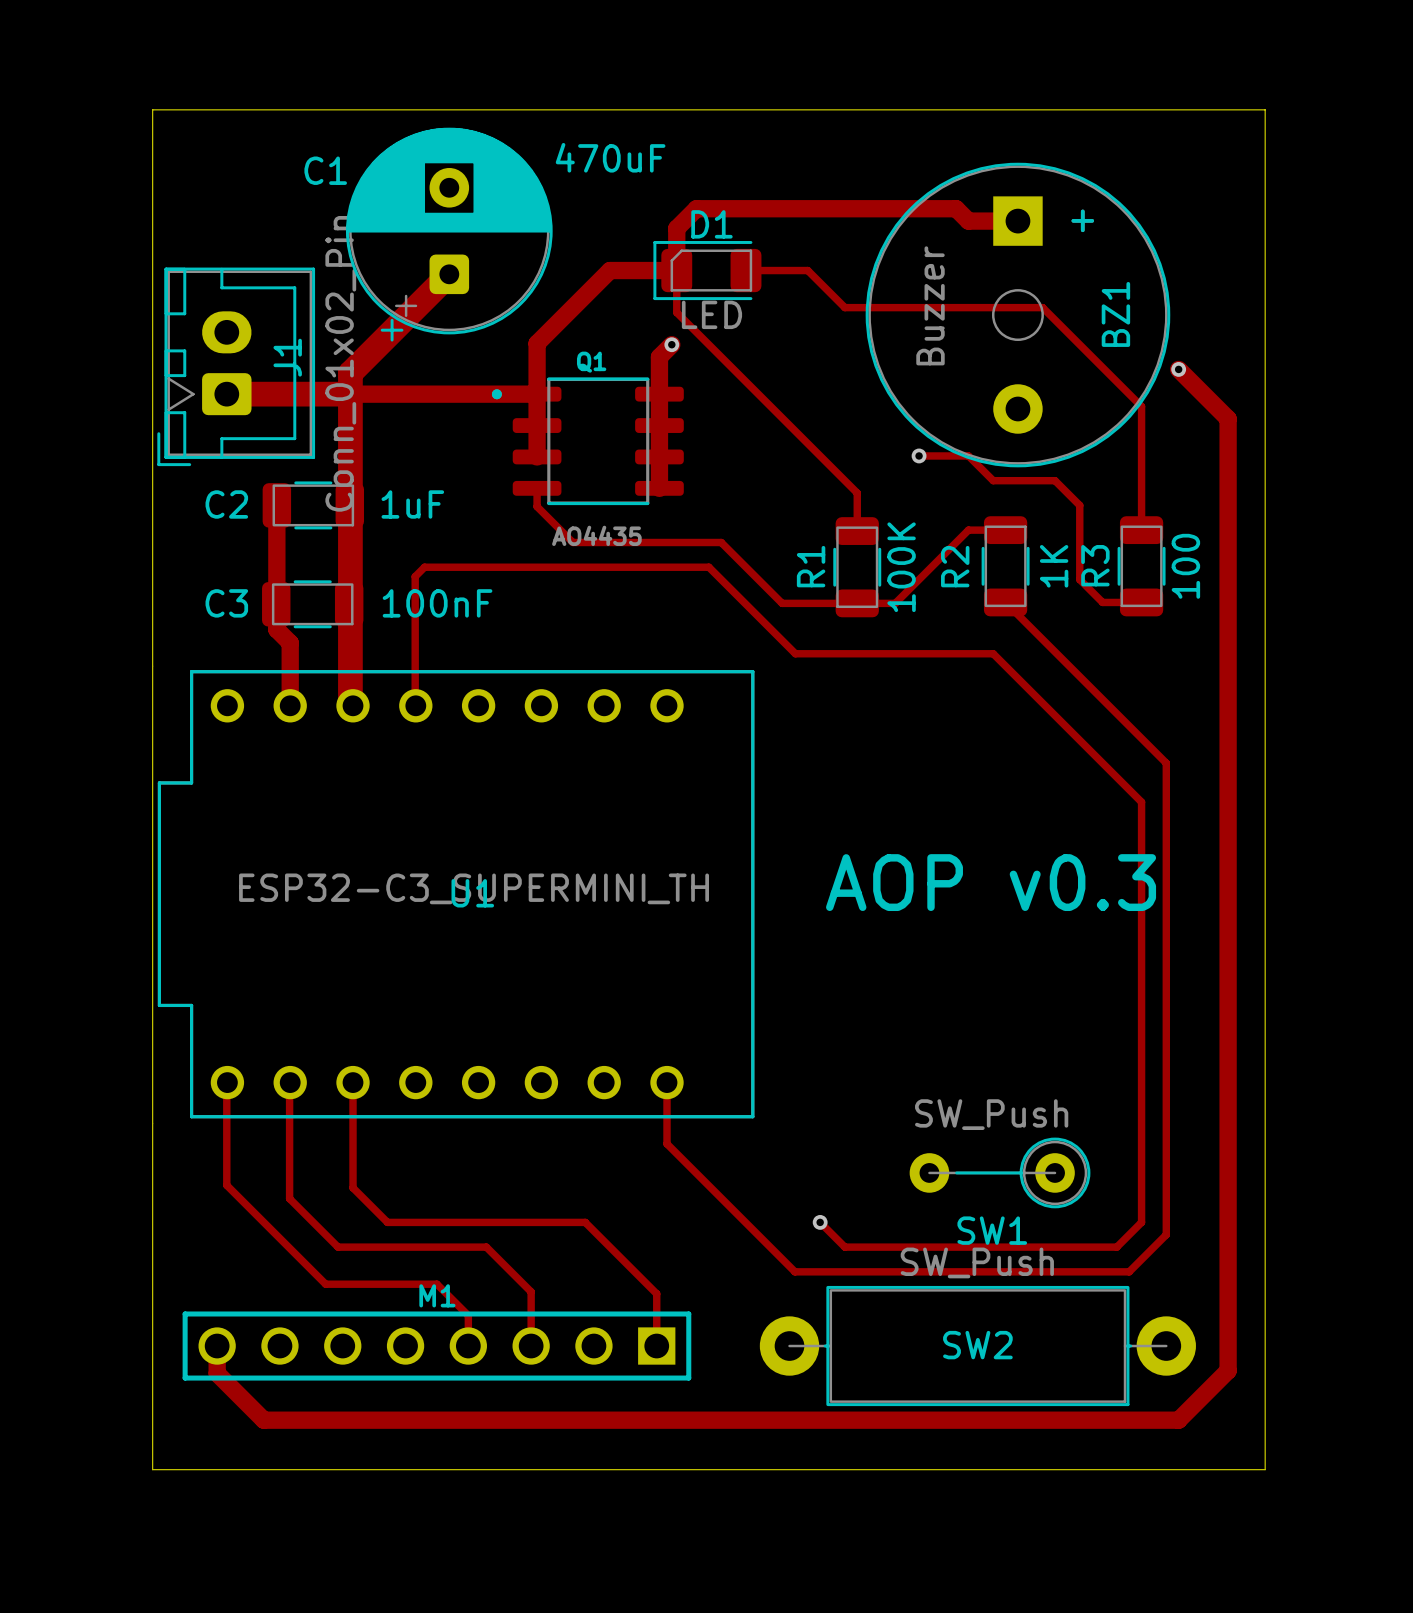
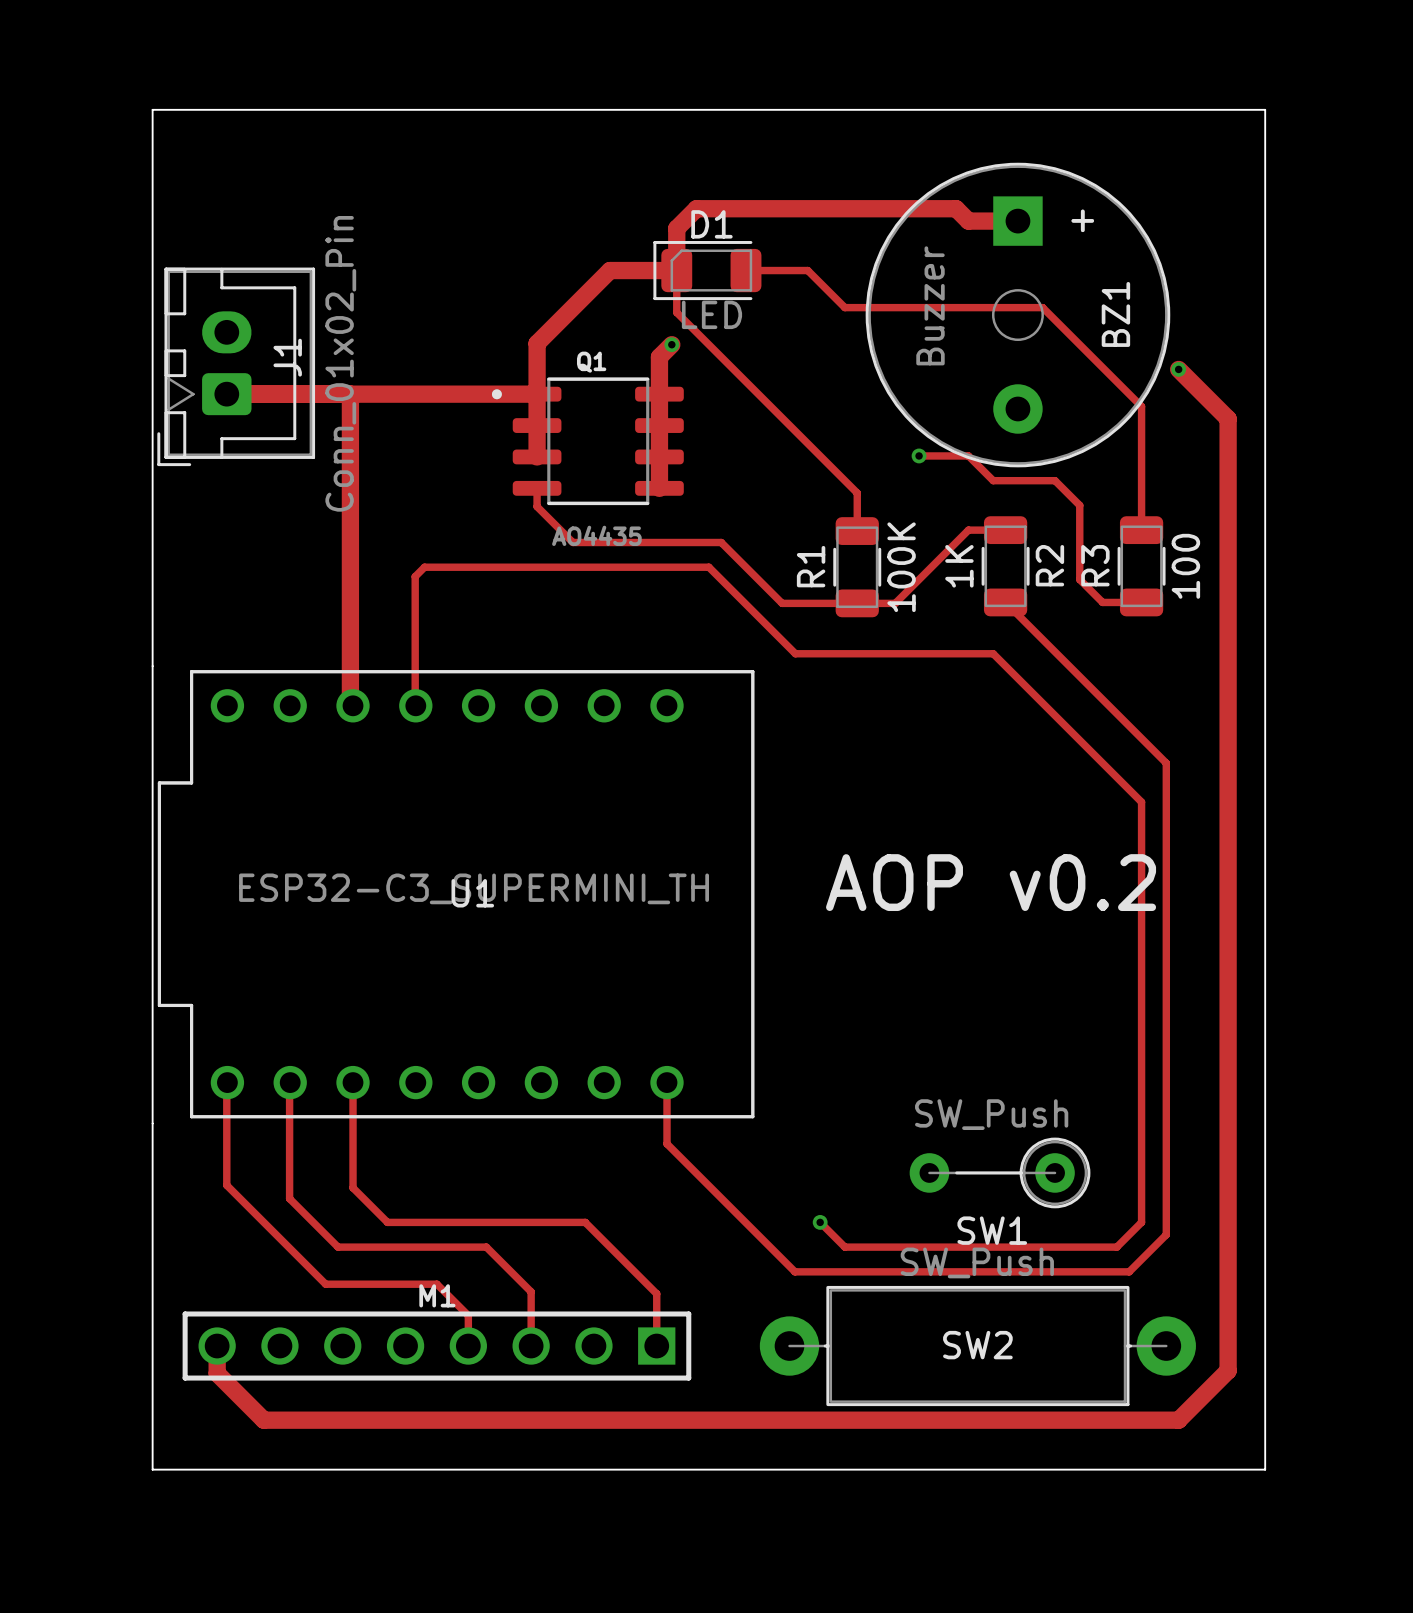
C1: 470uF (449, 234) -> none
track: (449, 274) (350, 373) (350, 394) -> none
track width: thick (226, 394) (350, 394) (350, 703) -> thin (226, 394) (350, 394) (350, 703)
track: (276, 505) (276, 629) (290, 643) (290, 705) -> none
C2: 1uF (313, 505) -> none
R2 name position: R2 (955, 566) -> R2 (1049, 565)
R2 value position: 1K (1054, 566) -> 1K (959, 566)
C3: 100nF (312, 604) -> none
text: AOP v0.3 (991, 882) -> AOP v0.2 (991, 882)

